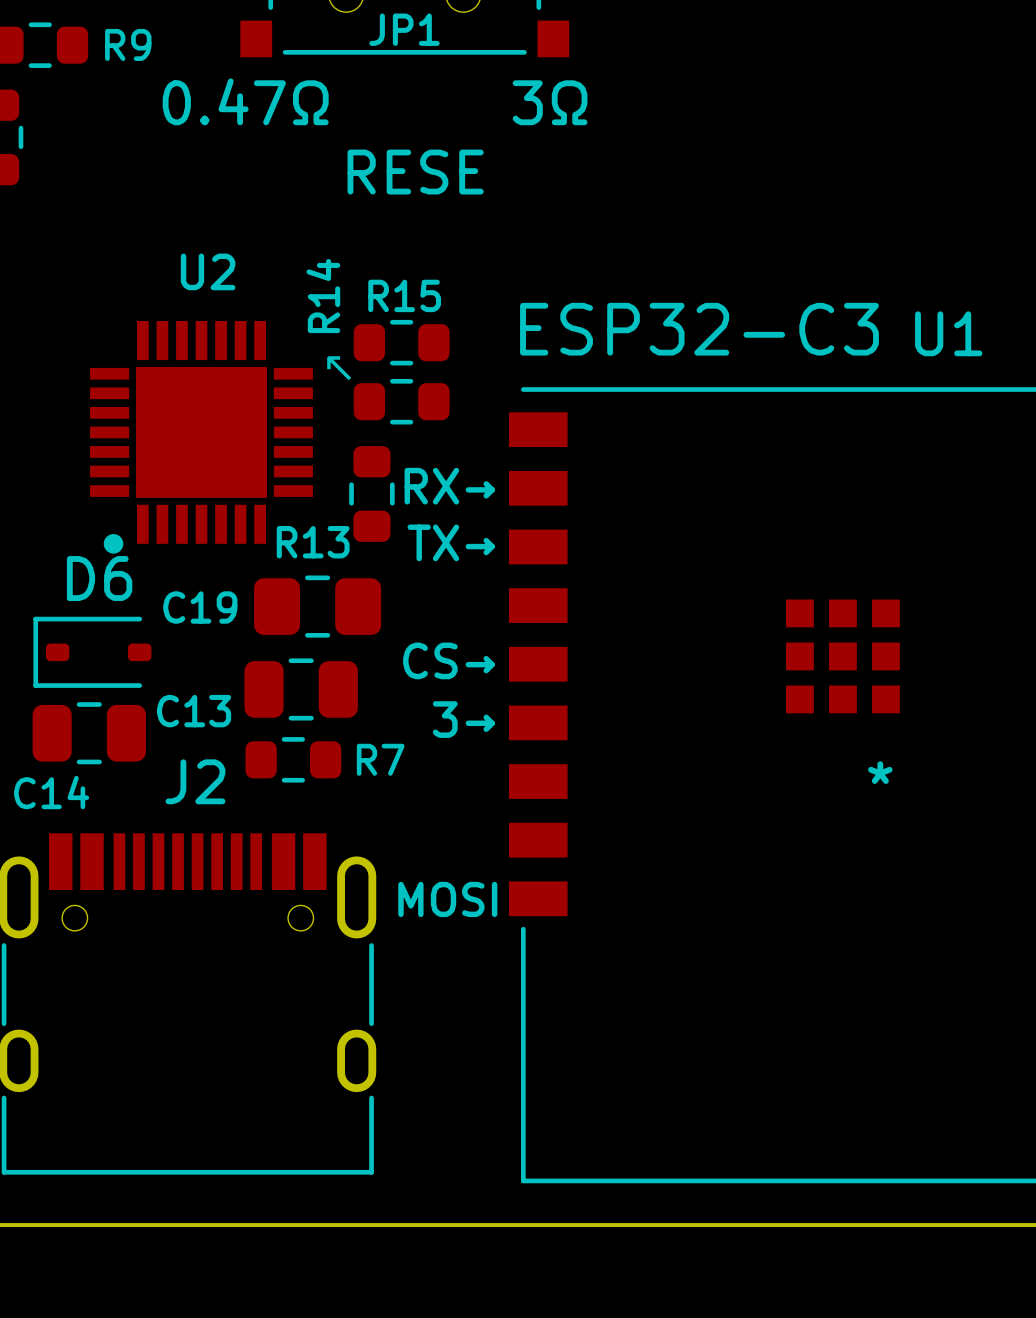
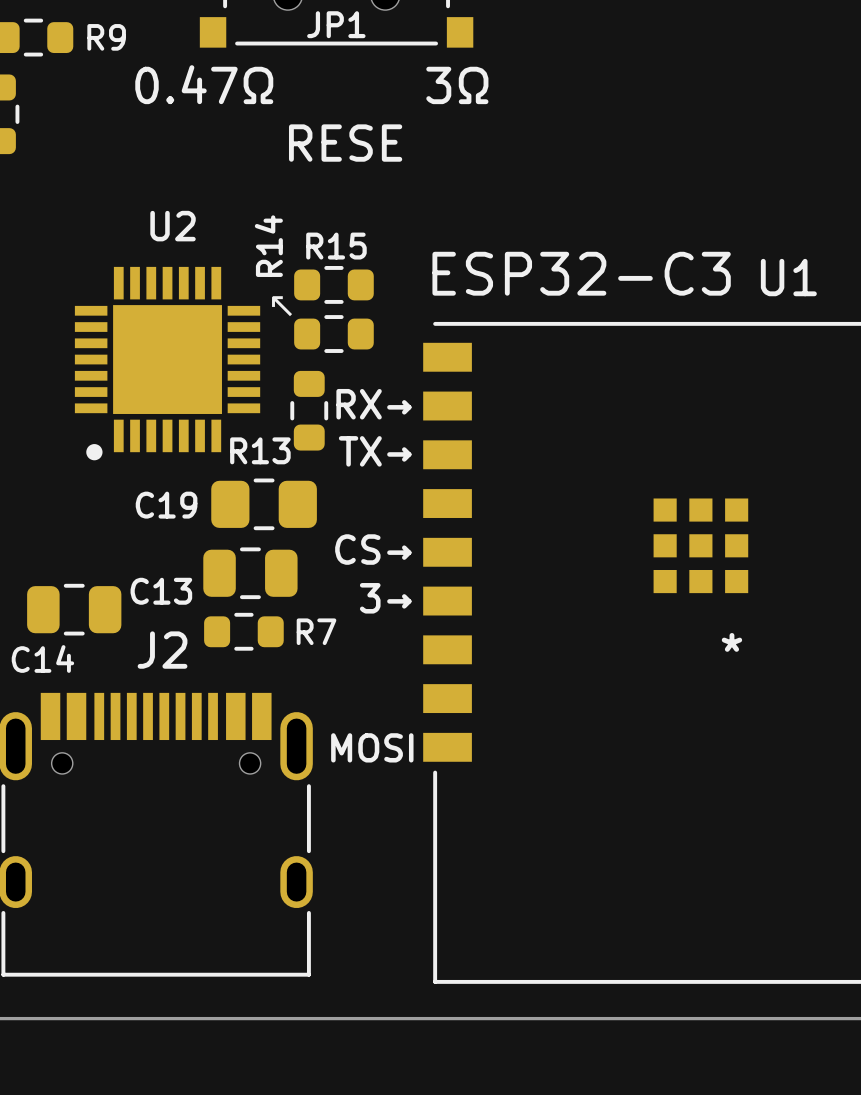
D6: (92, 652) -> none

